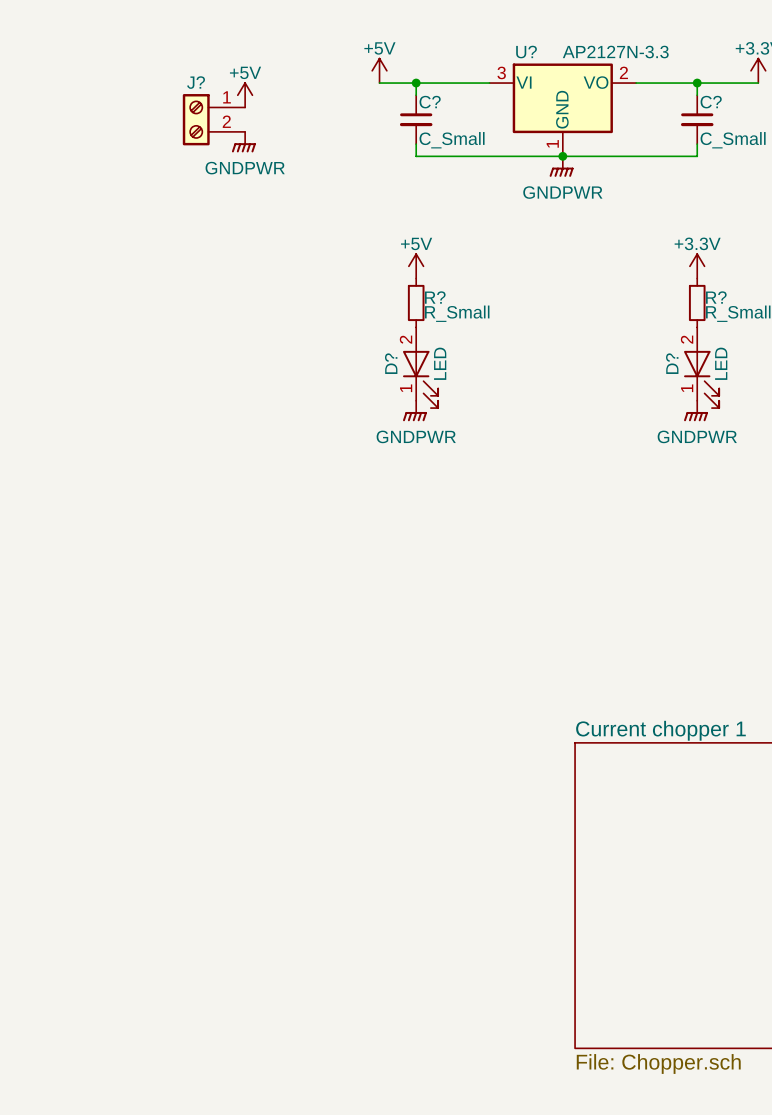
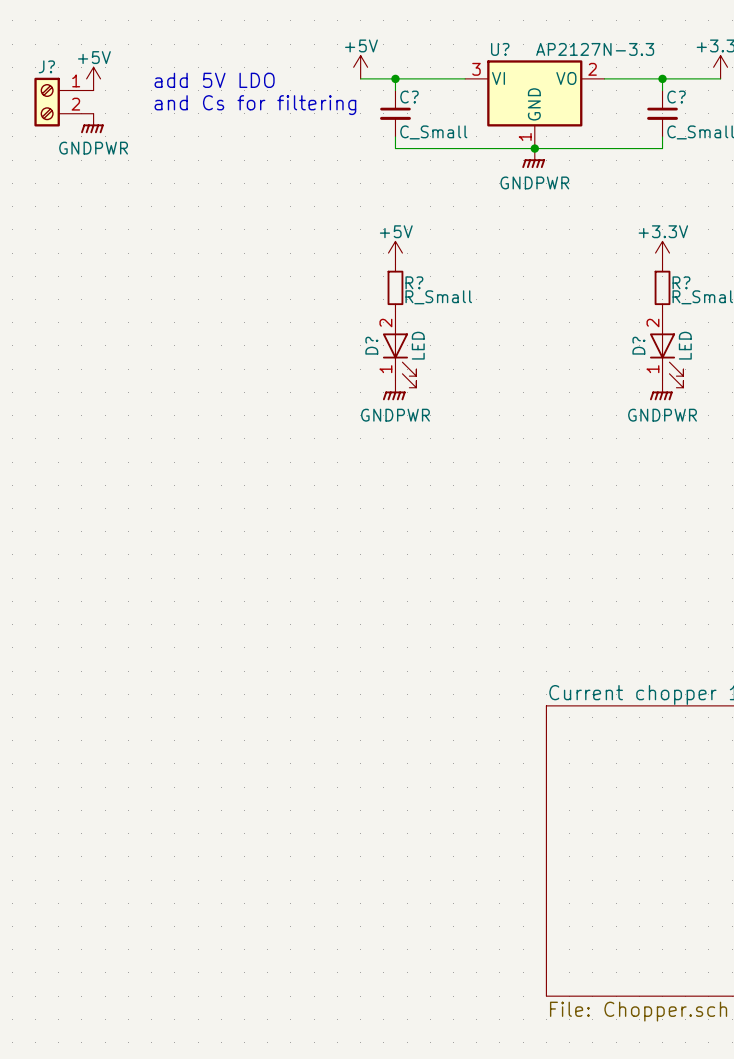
text: none -> add 5V LDO (214, 80)
power symbol position: +5V (245, 95) -> +5V (93, 78)
text: none -> and Cs for filtering (255, 105)
J? position: (213, 119) -> (63, 102)
power symbol position: GNDPWR (243, 142) -> GNDPWR (92, 123)

